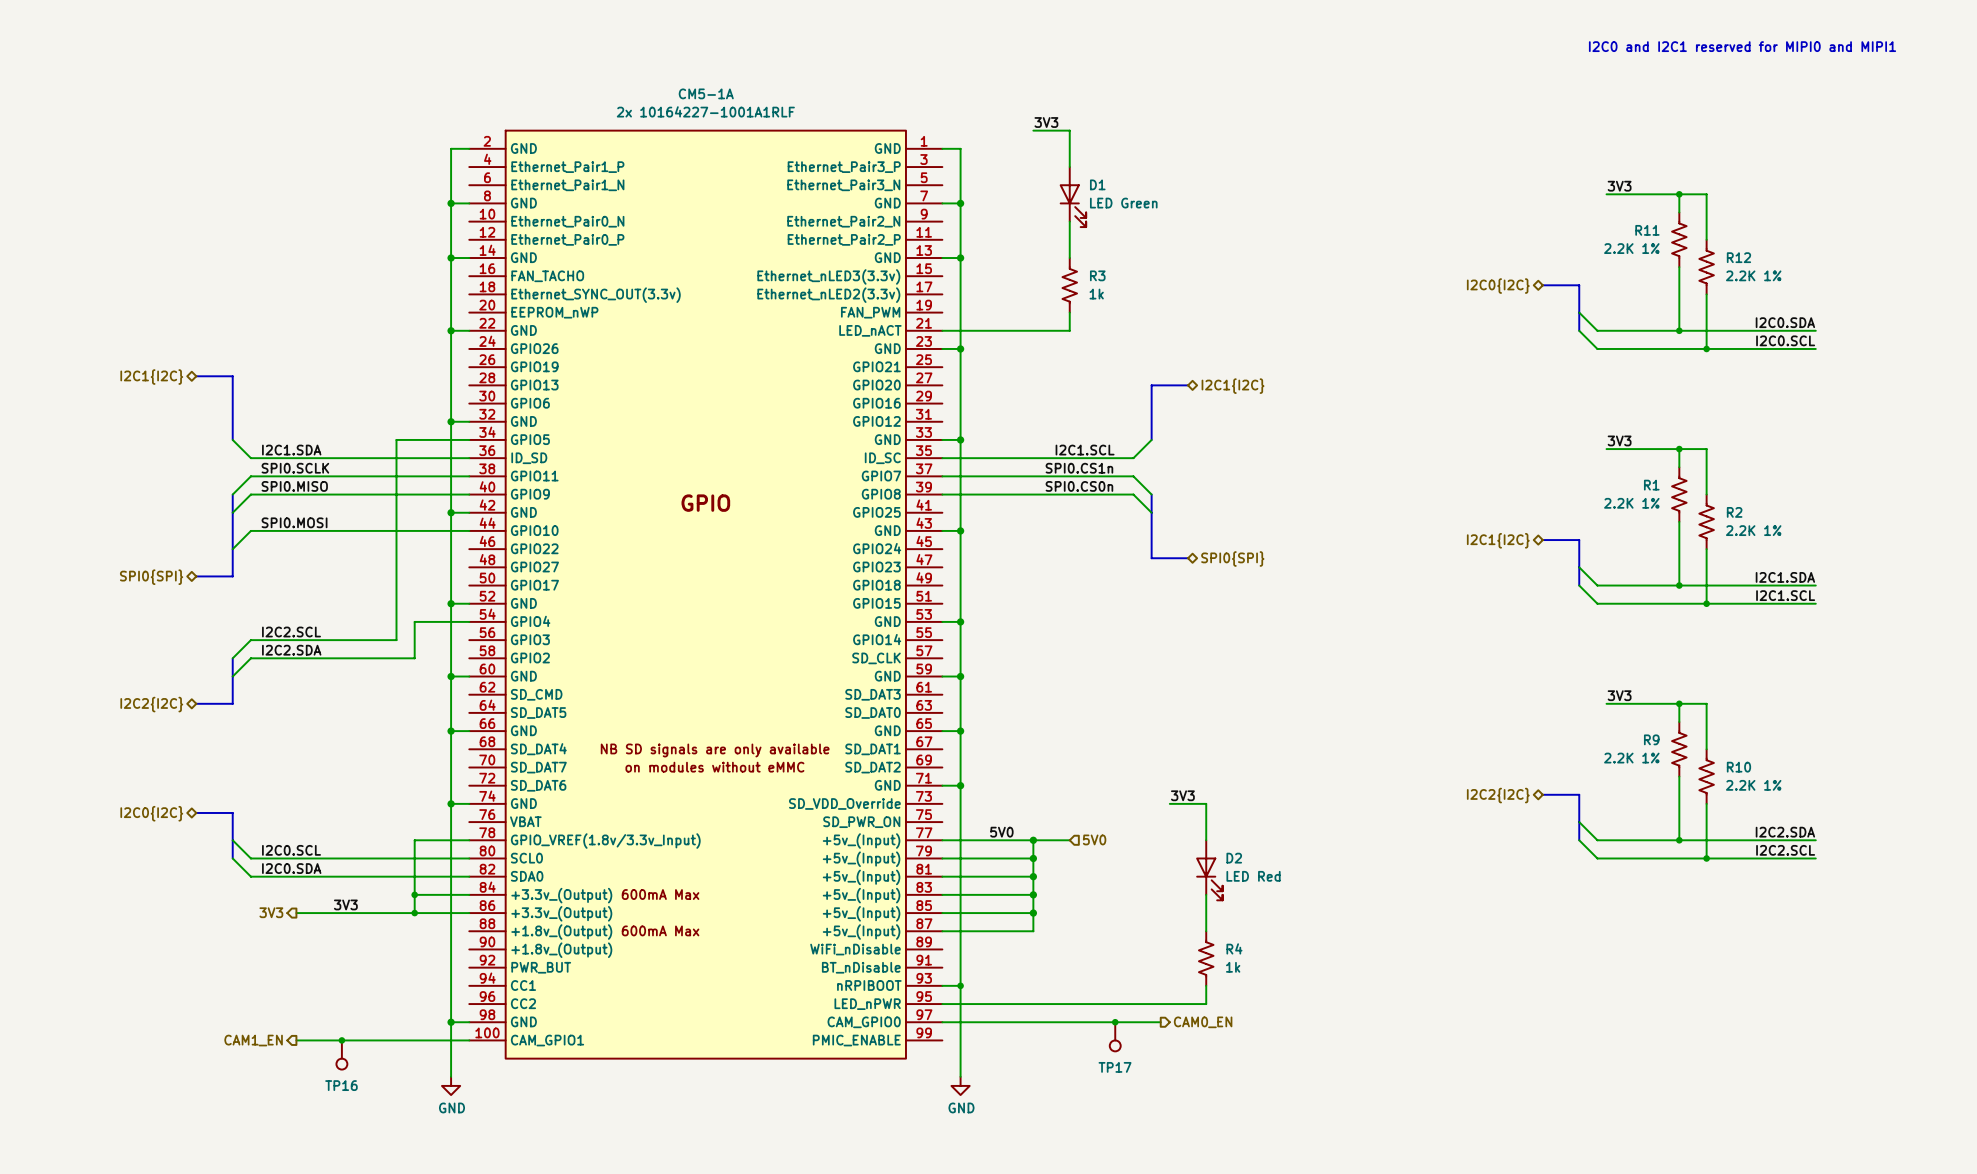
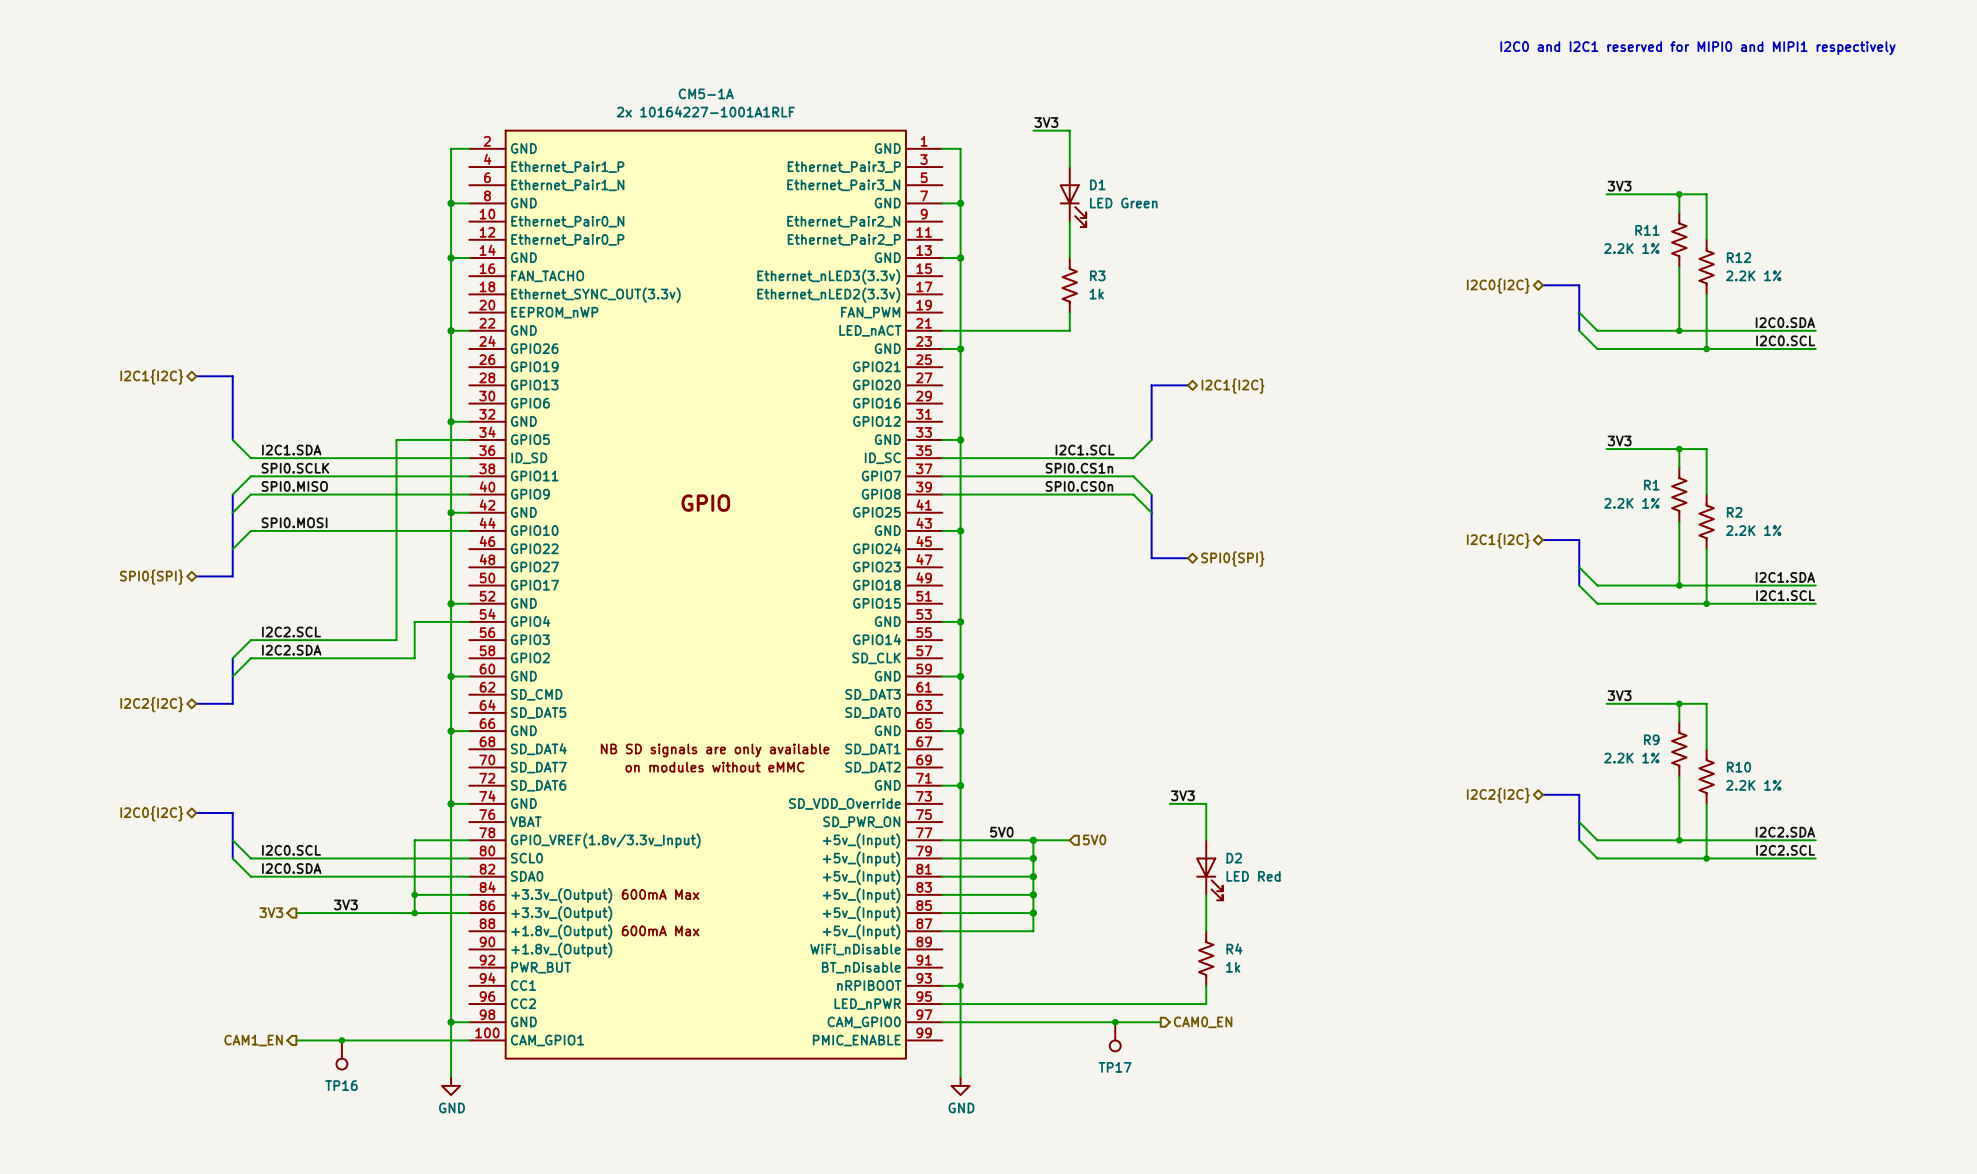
text: I2C0 and I2C1 reserved for MIPI0 and MIPI1 (1742, 46) -> none
text: none -> I2C0 and I2C1 reserved for MIPI0 and MIPI1 respectively (1697, 48)

